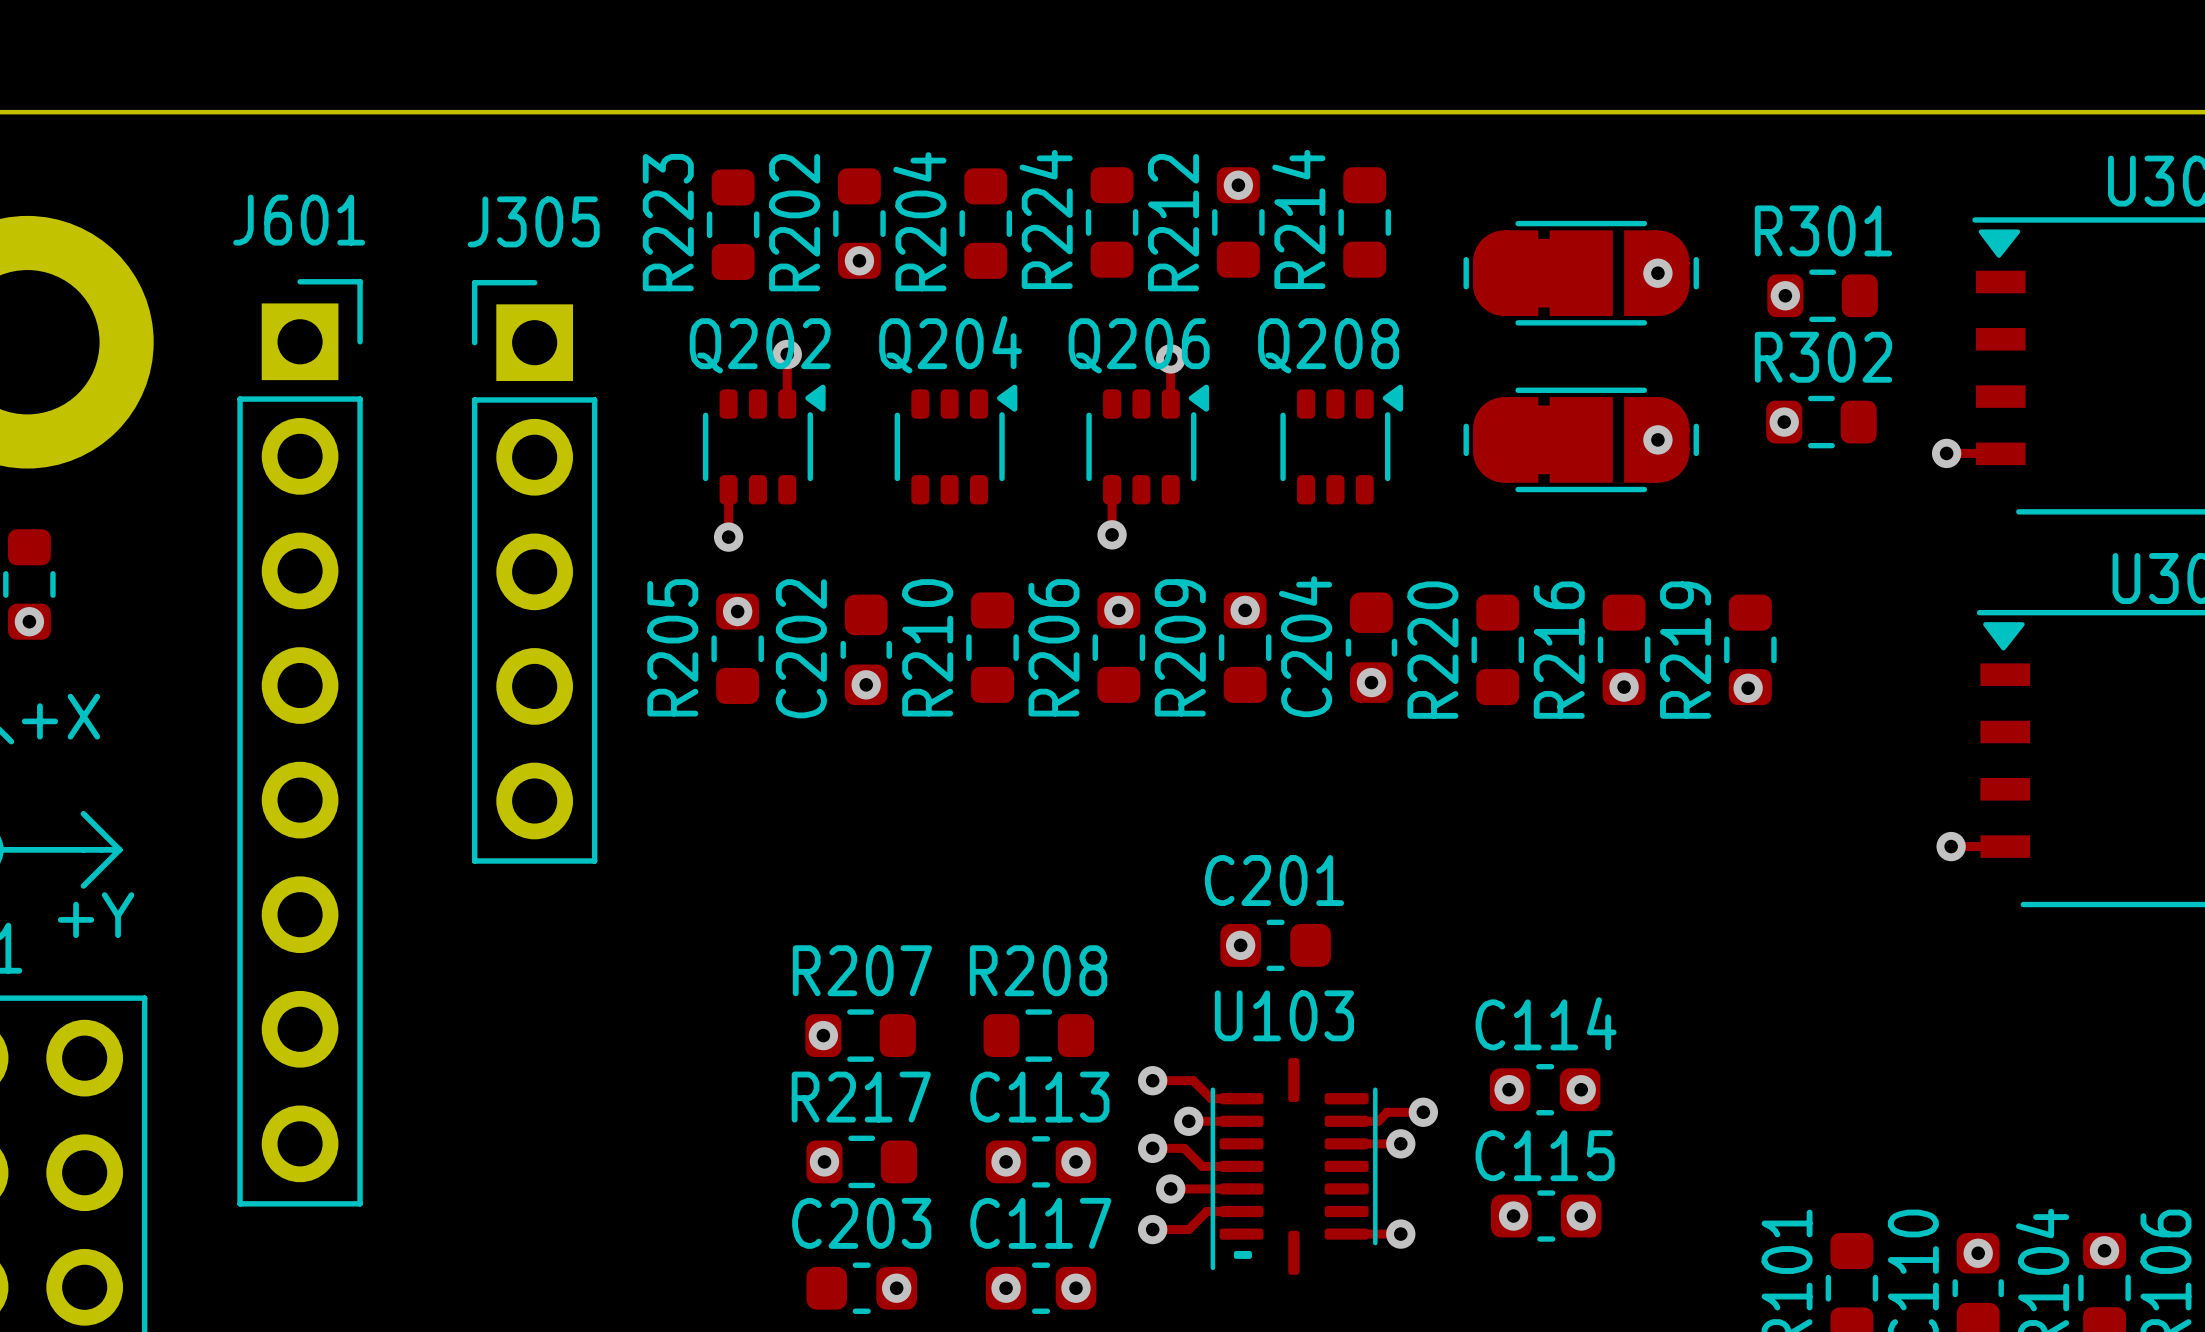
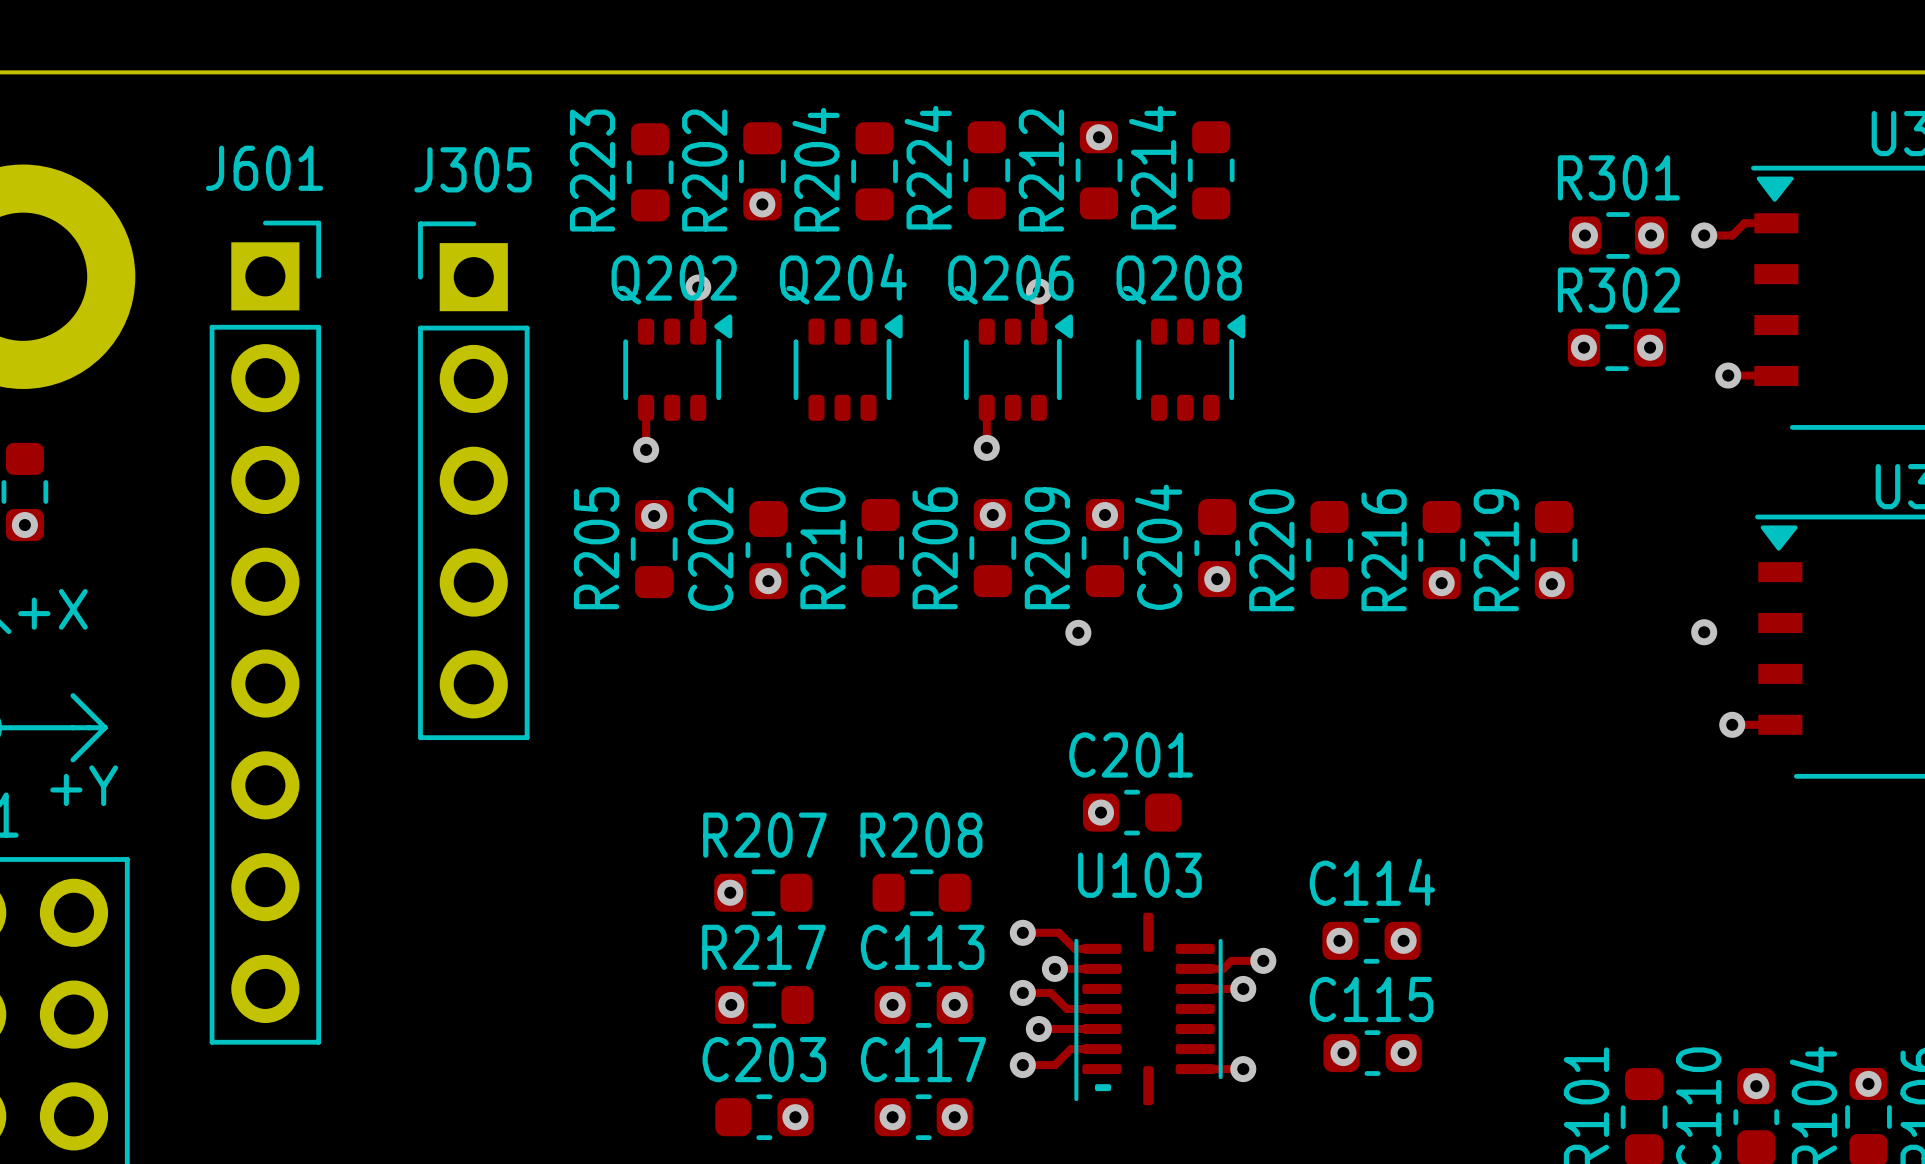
part: (1581, 273) -> none
via: (1657, 273) -> none
track: none -> (1776, 223) (1744, 223) (1732, 235) (1704, 235)
via: none -> (1651, 235)
via: none -> (1704, 235)
via: none -> (1650, 347)
part: (1581, 439) -> none
via: (1657, 439) -> none
via: none -> (1704, 632)
via: none -> (1078, 632)

